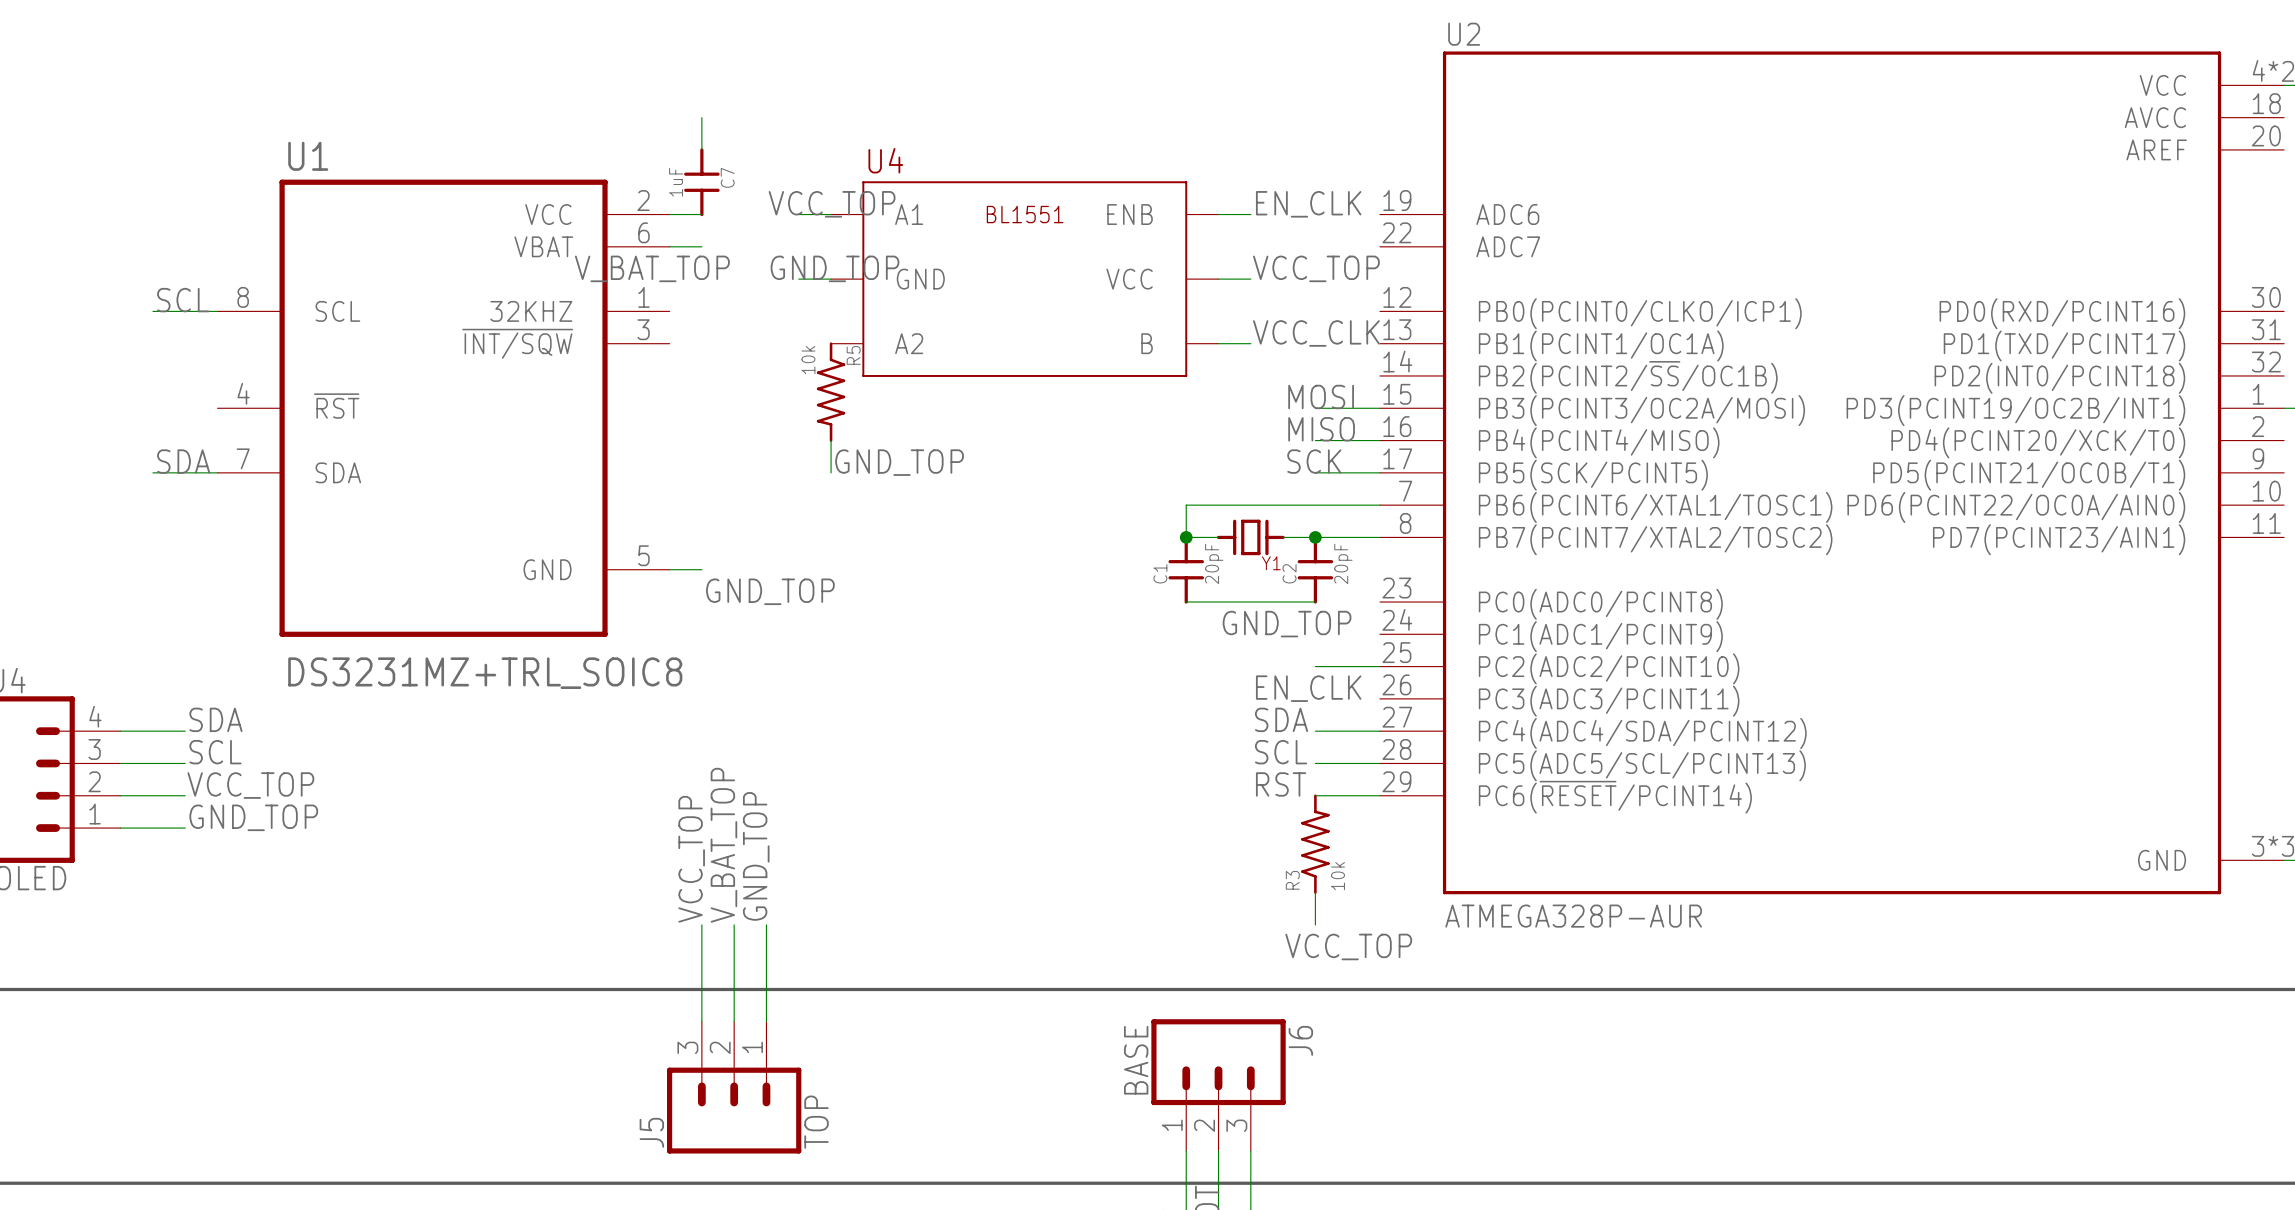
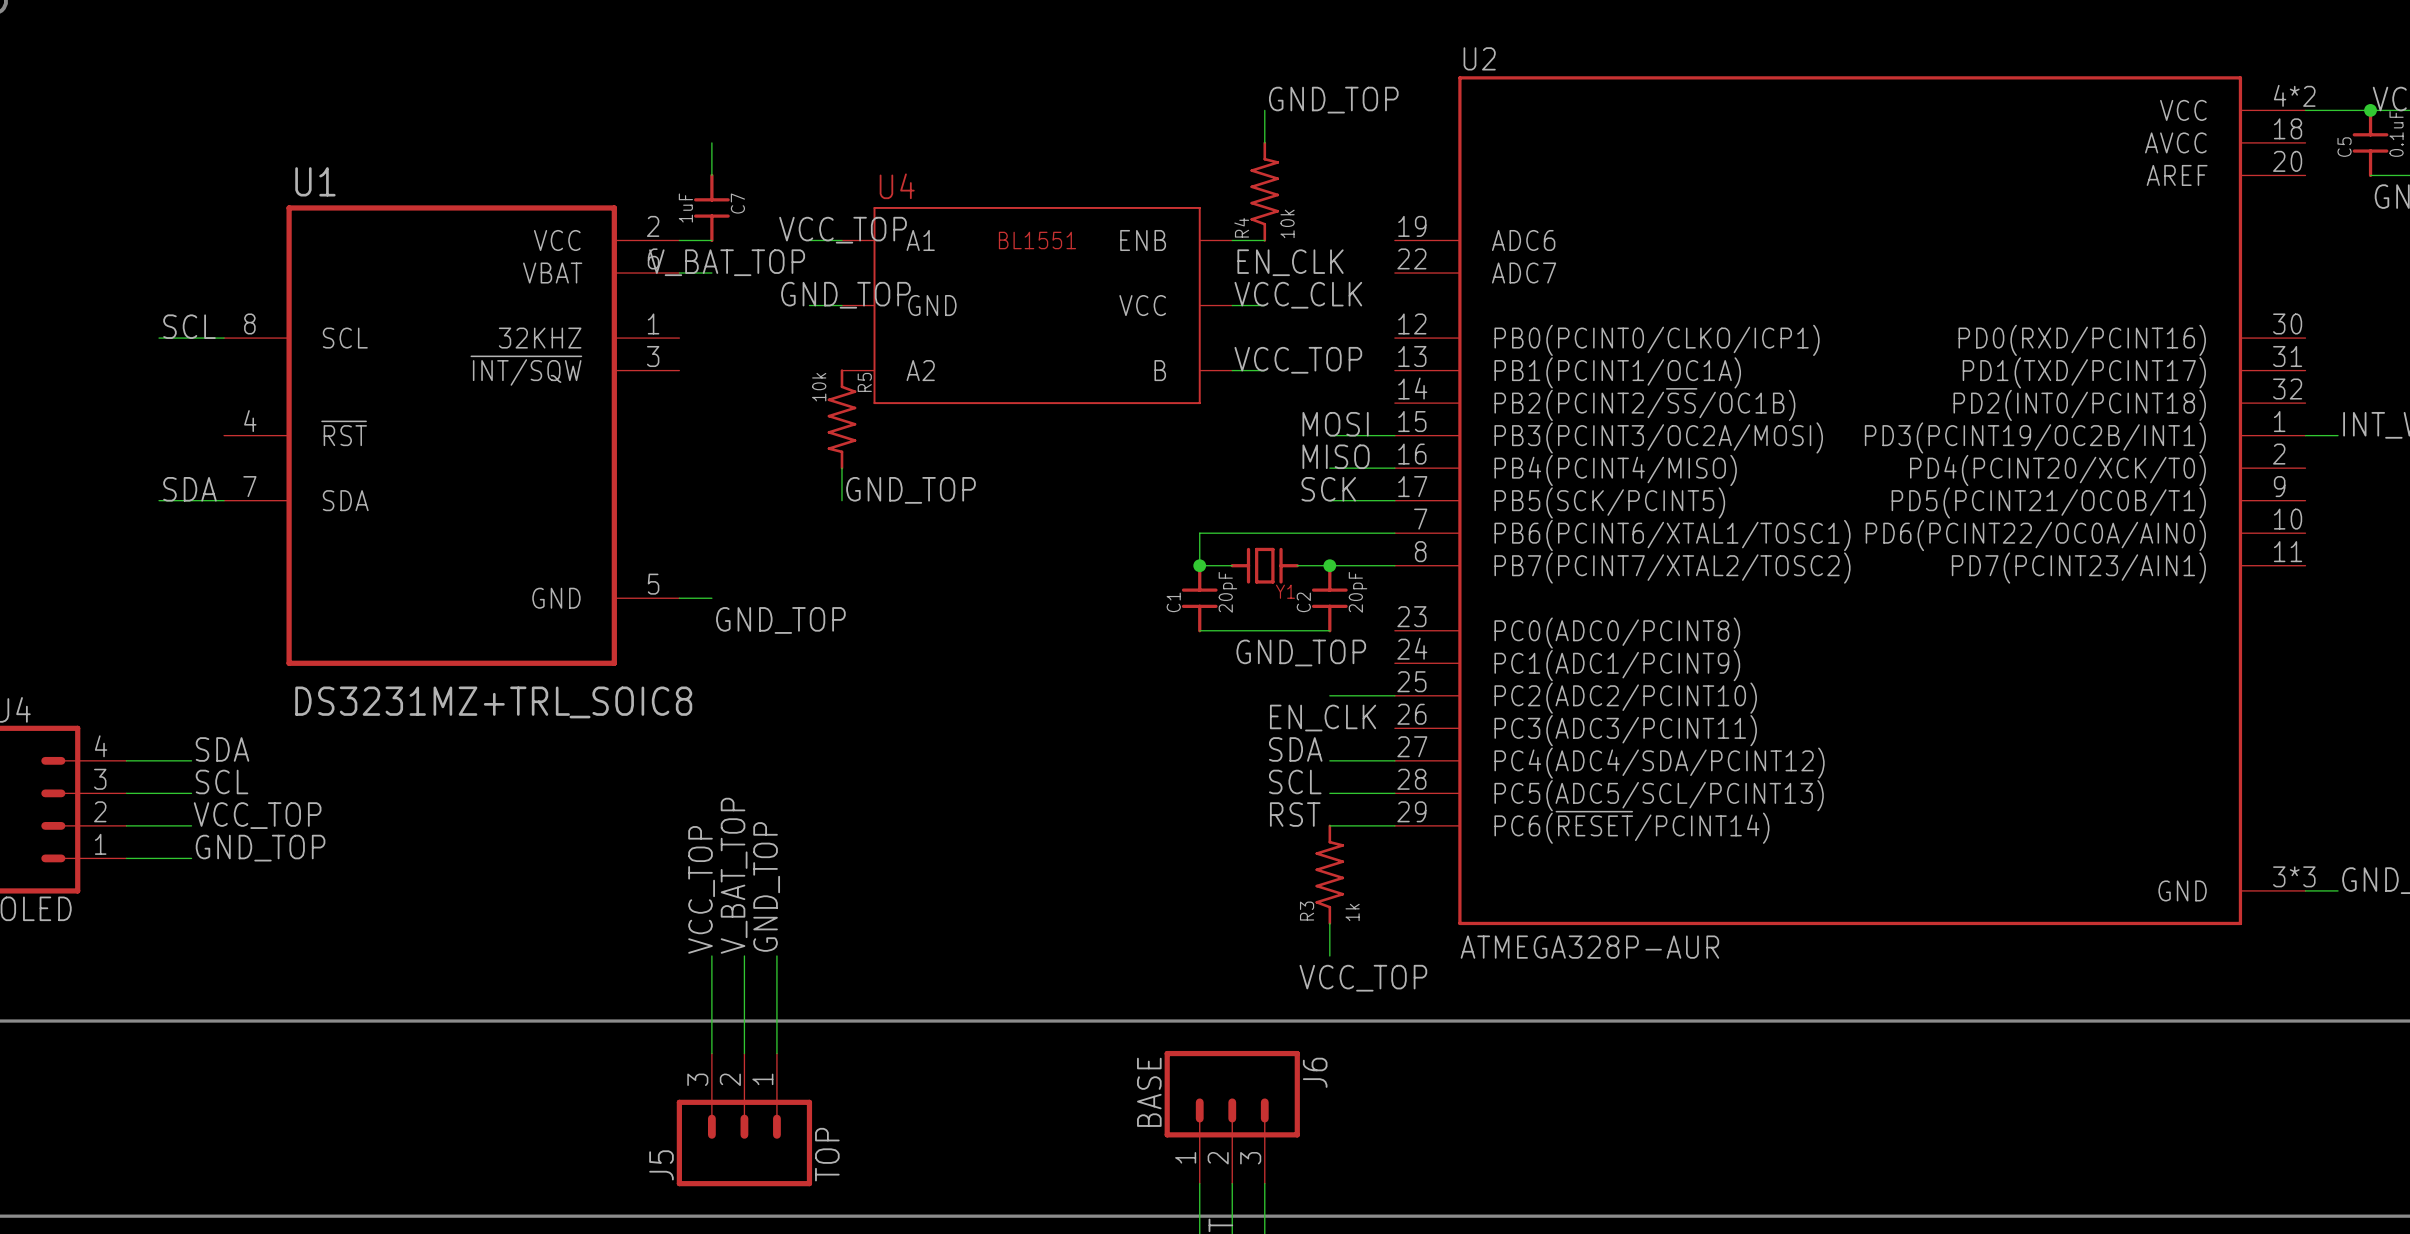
label: none -> GND_TOP (1333, 100)
wire: none -> (1264, 110) (1264, 142)
R4: none -> 10k (1264, 191)
label position: EN_CLK (1308, 204) -> EN_CLK (1290, 262)
label position: V_BAT_TOP (652, 268) -> V_BAT_TOP (727, 262)
label position: VCC_TOP (1316, 268) -> VCC_TOP (1298, 360)
label position: VCC_CLK (1316, 333) -> VCC_CLK (1298, 295)
R3 value: 10k (1337, 876) -> 1k (1352, 912)

